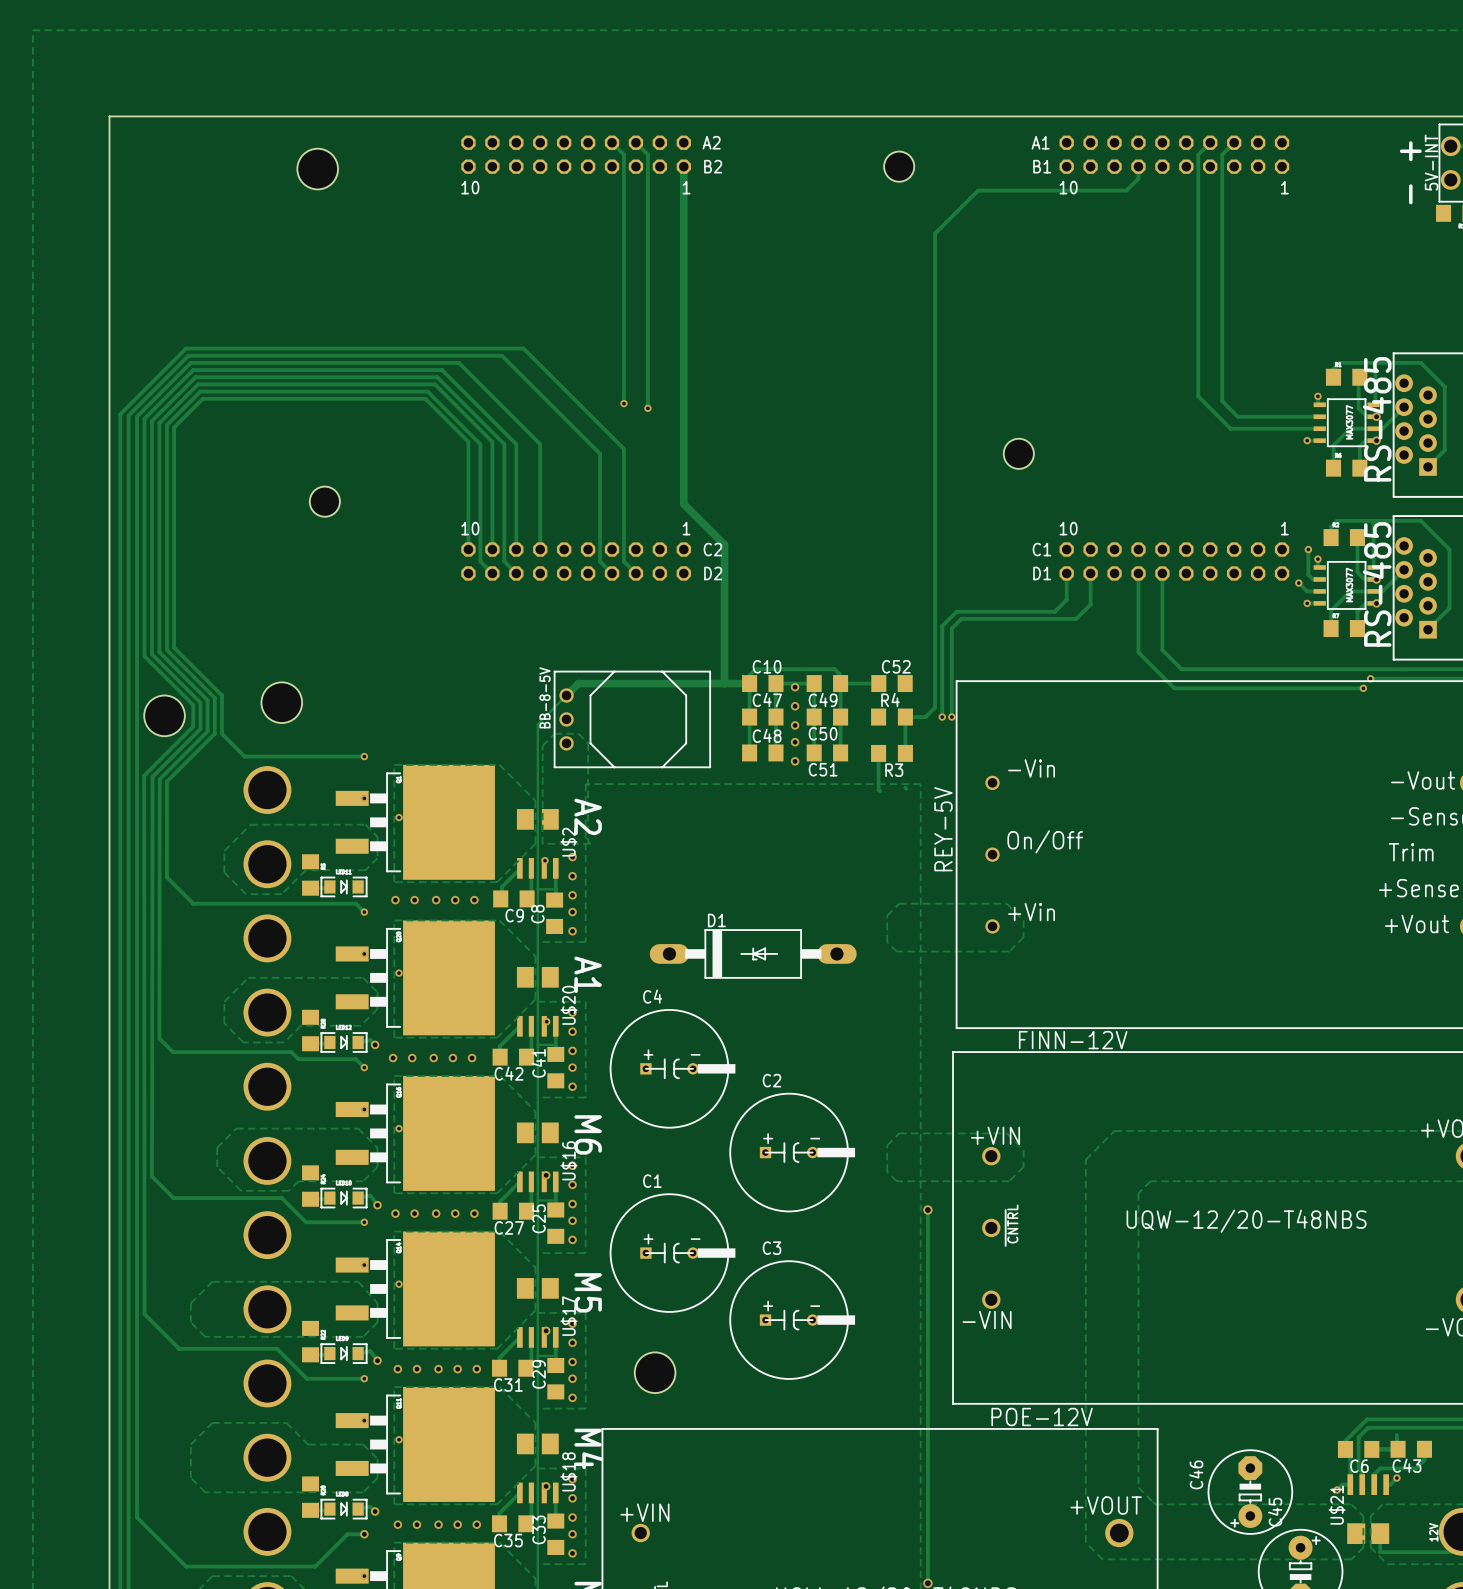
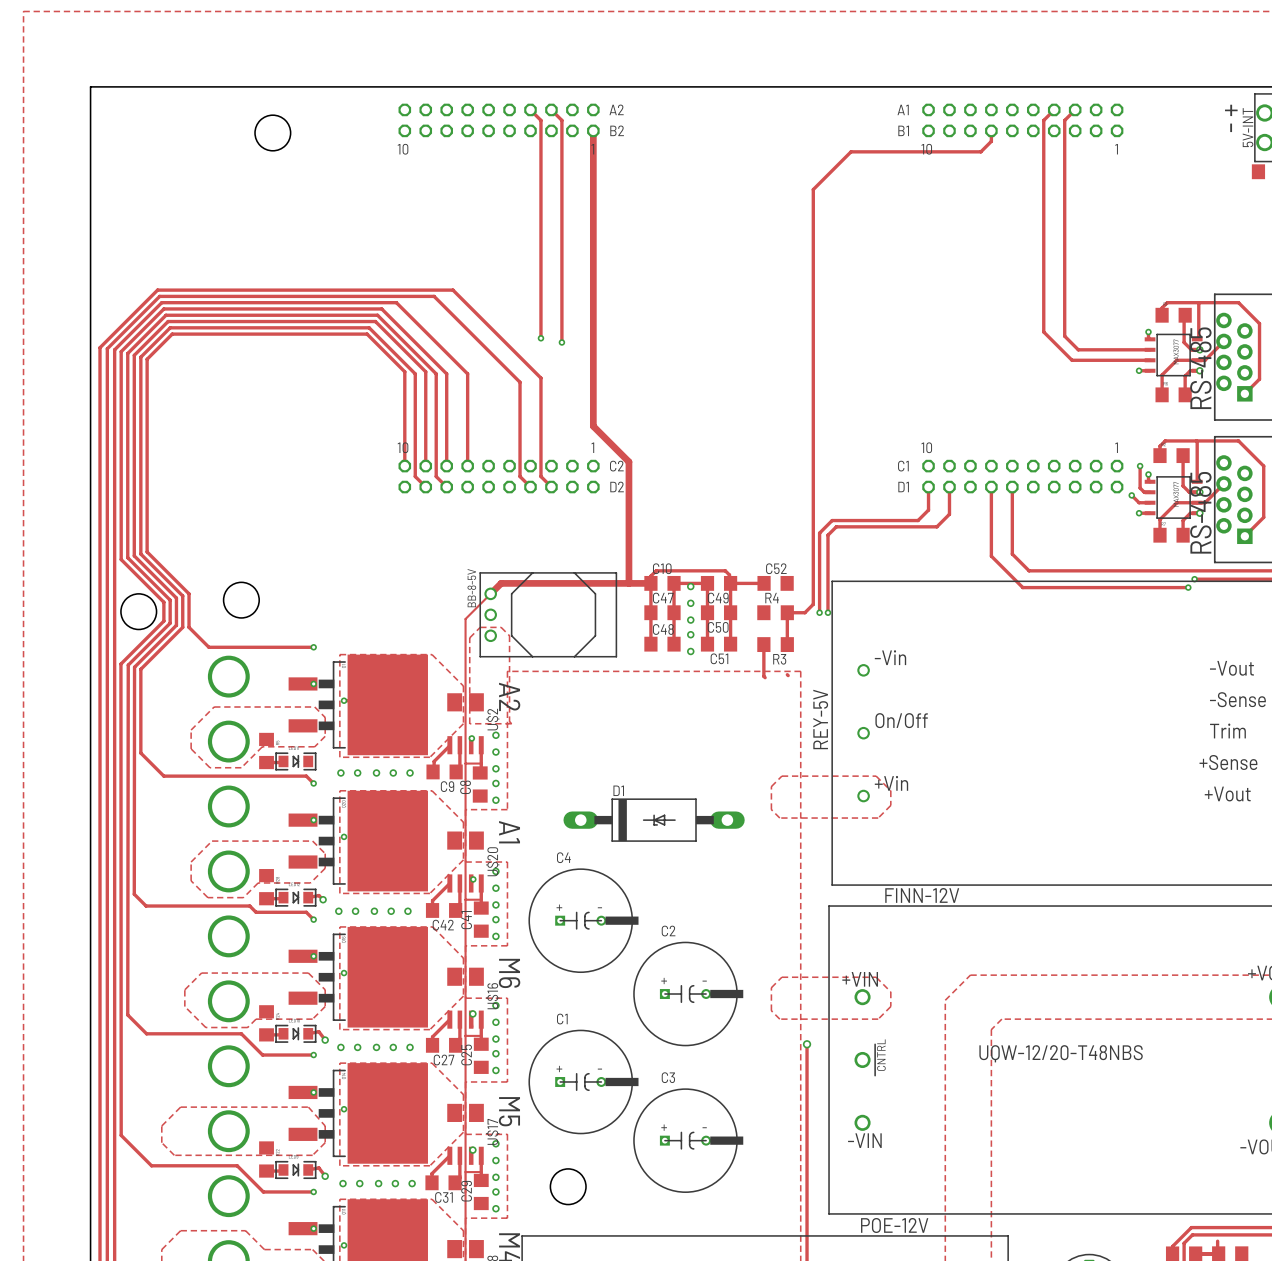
hole: (899, 166) -> none
hole: (1018, 453) -> none
hole: (324, 501) -> none

